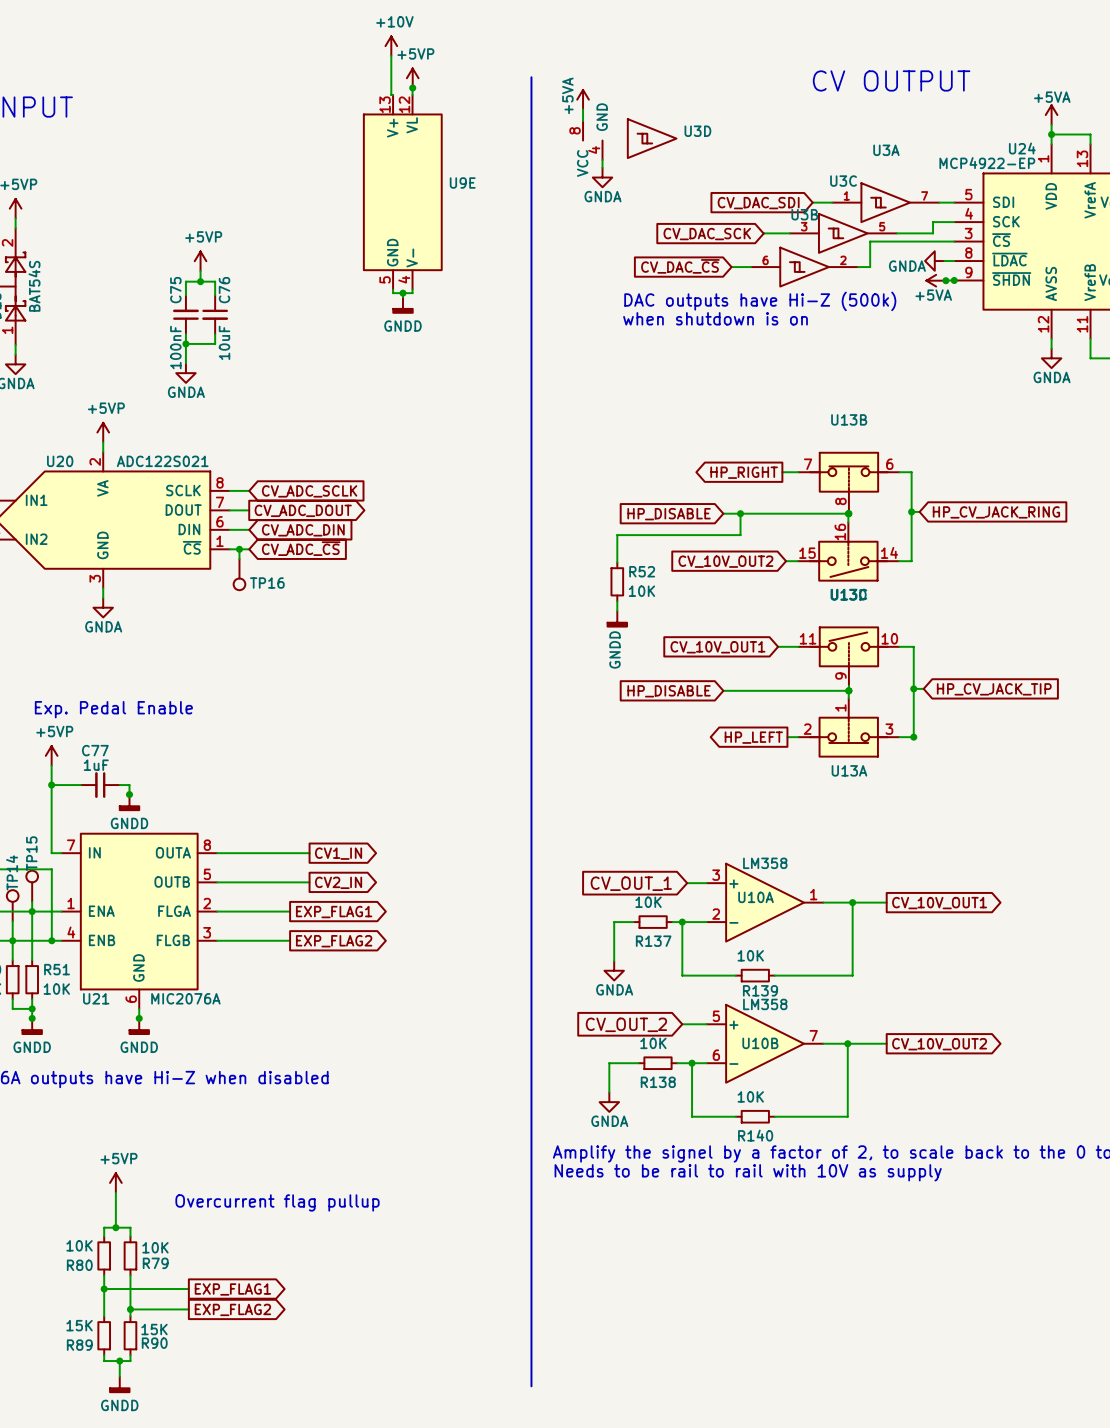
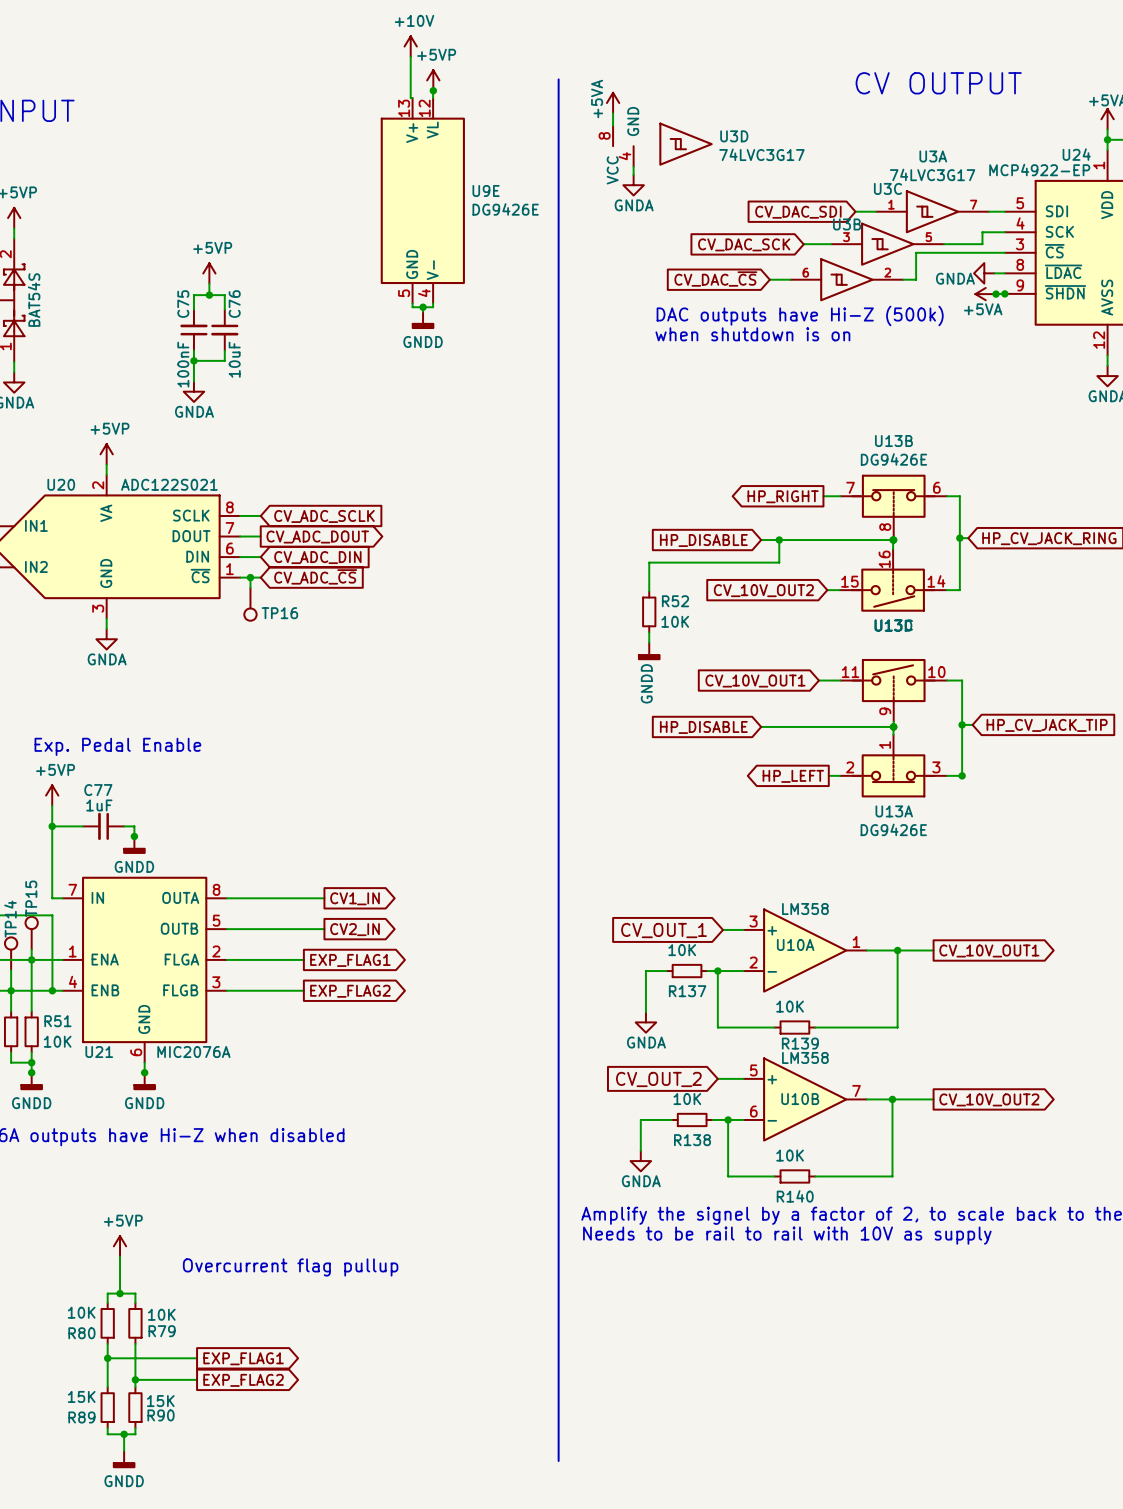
U3D value: none -> 74LVC3G17 (761, 154)
U3A value: none -> 74LVC3G17 (932, 174)
U9E value: none -> DG9426E (505, 209)
U13B value: none -> DG9426E (893, 459)
U13A value: none -> DG9426E (893, 829)

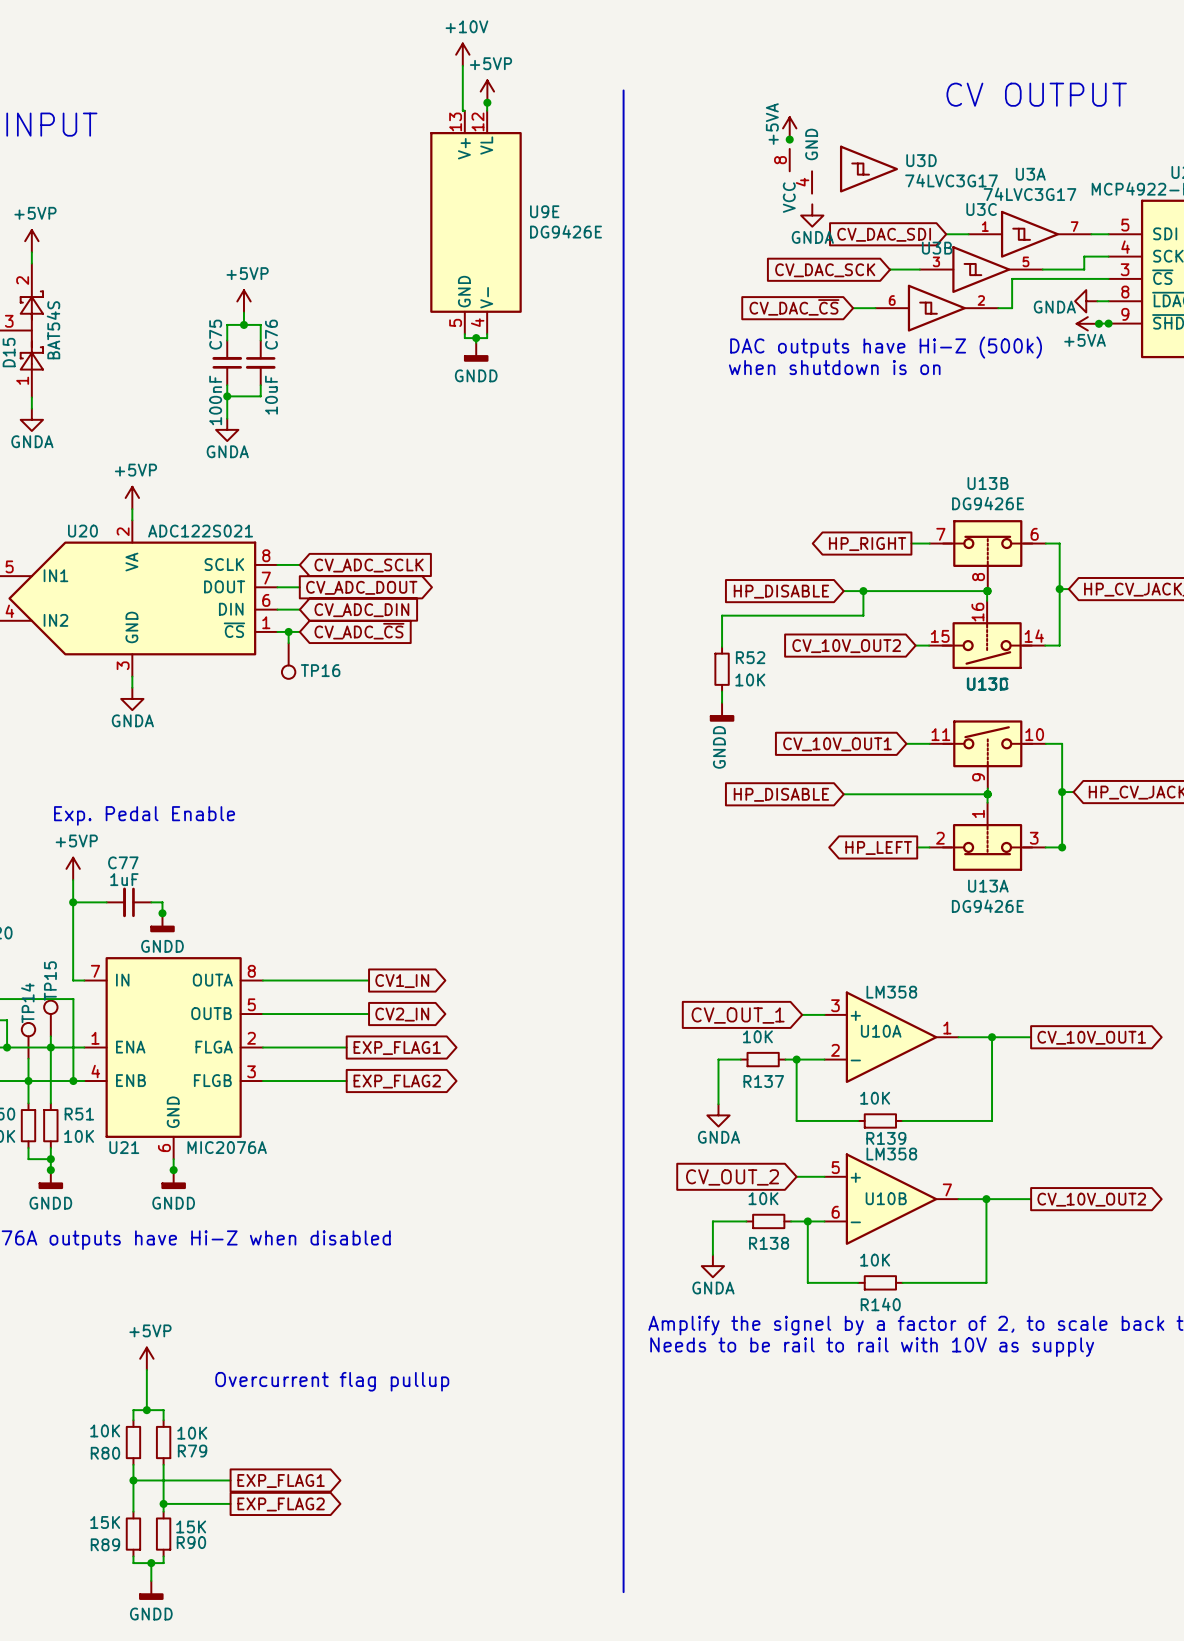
power symbol position: +5VA (613, 103) -> +5VA (789, 128)
wire: (613, 113) (613, 125) -> none
junction: none -> (789, 139)
U3D position: (662, 144) -> (843, 169)
wire: (633, 166) (633, 174) -> none
power symbol position: GNDA (633, 185) -> GNDA (812, 215)

